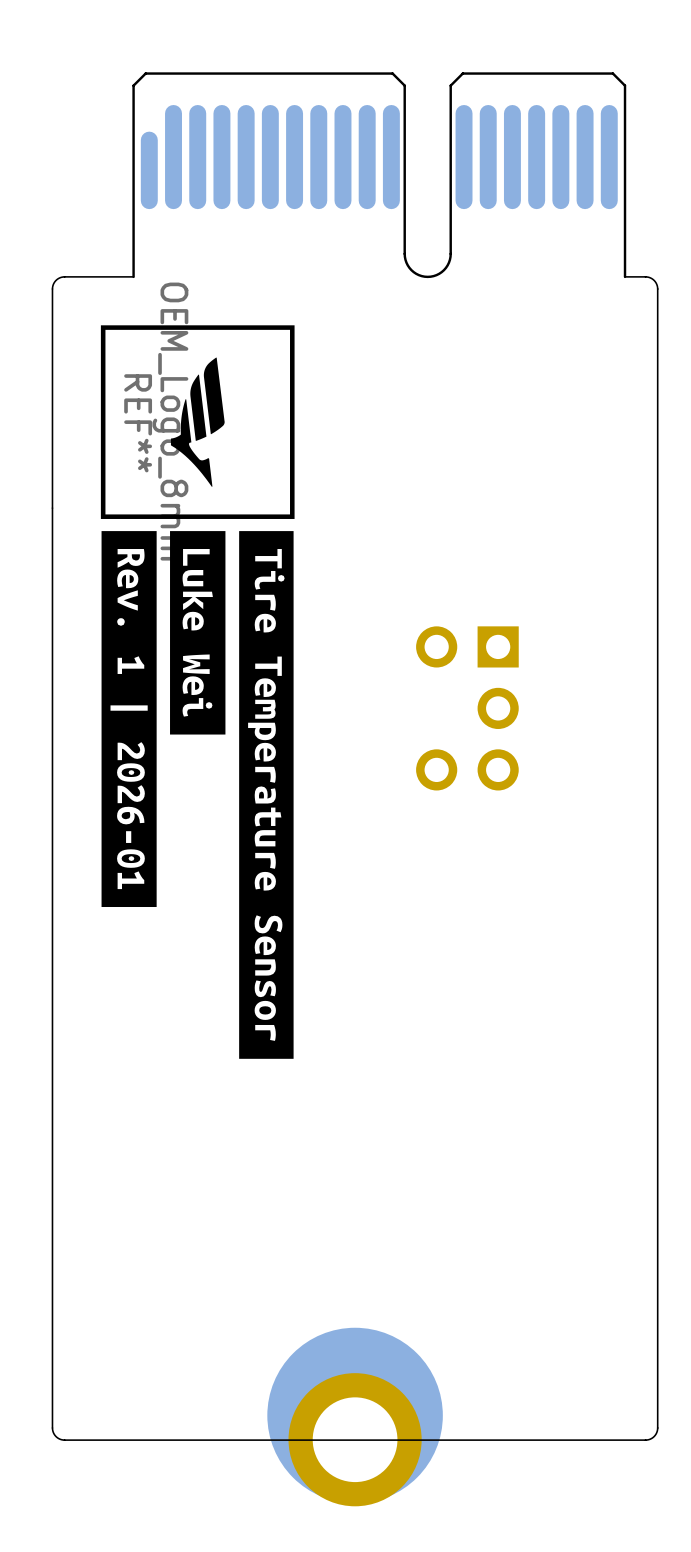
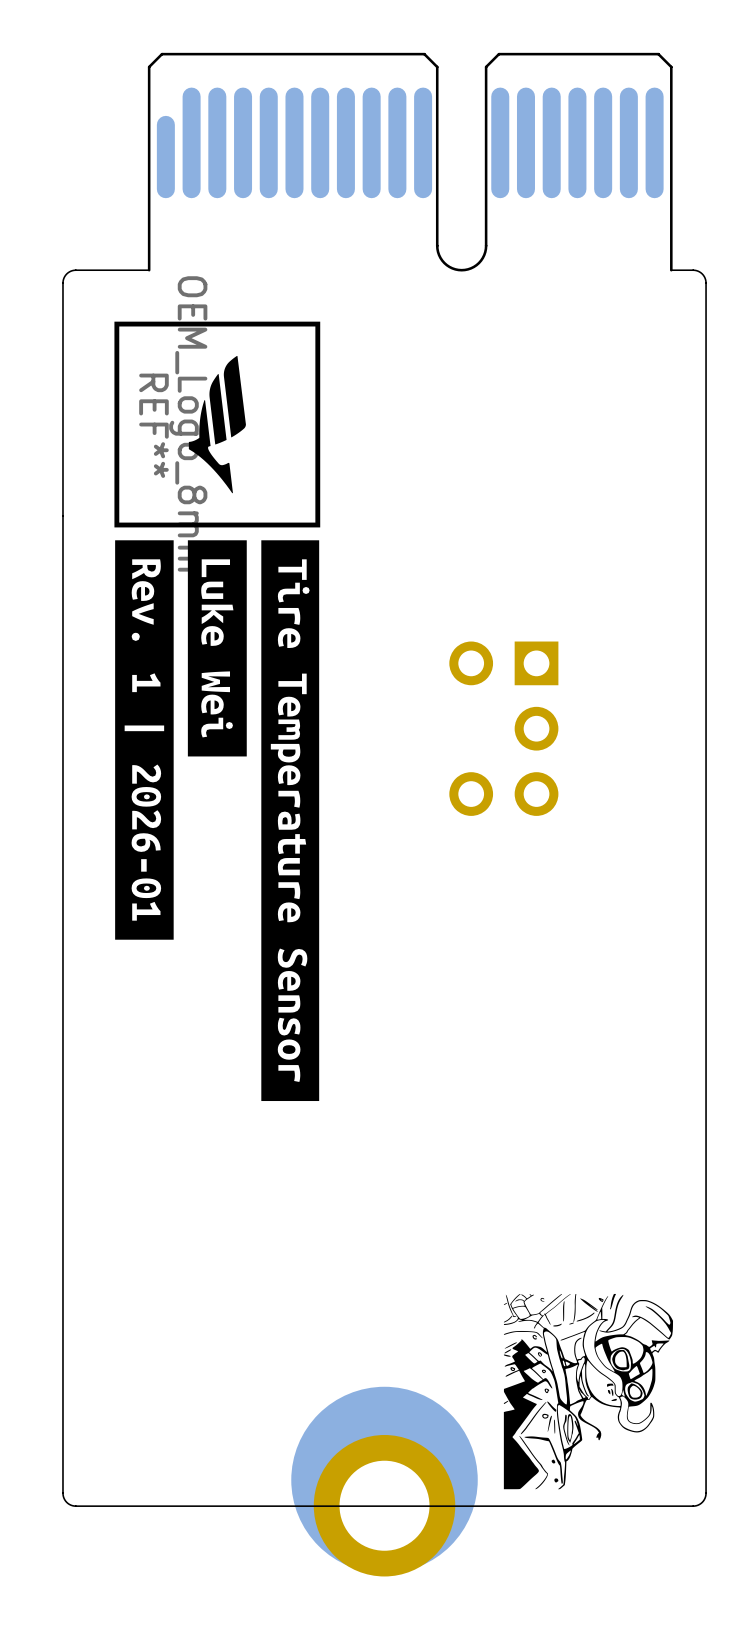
drawing: none -> [503, 1293, 674, 1490]

